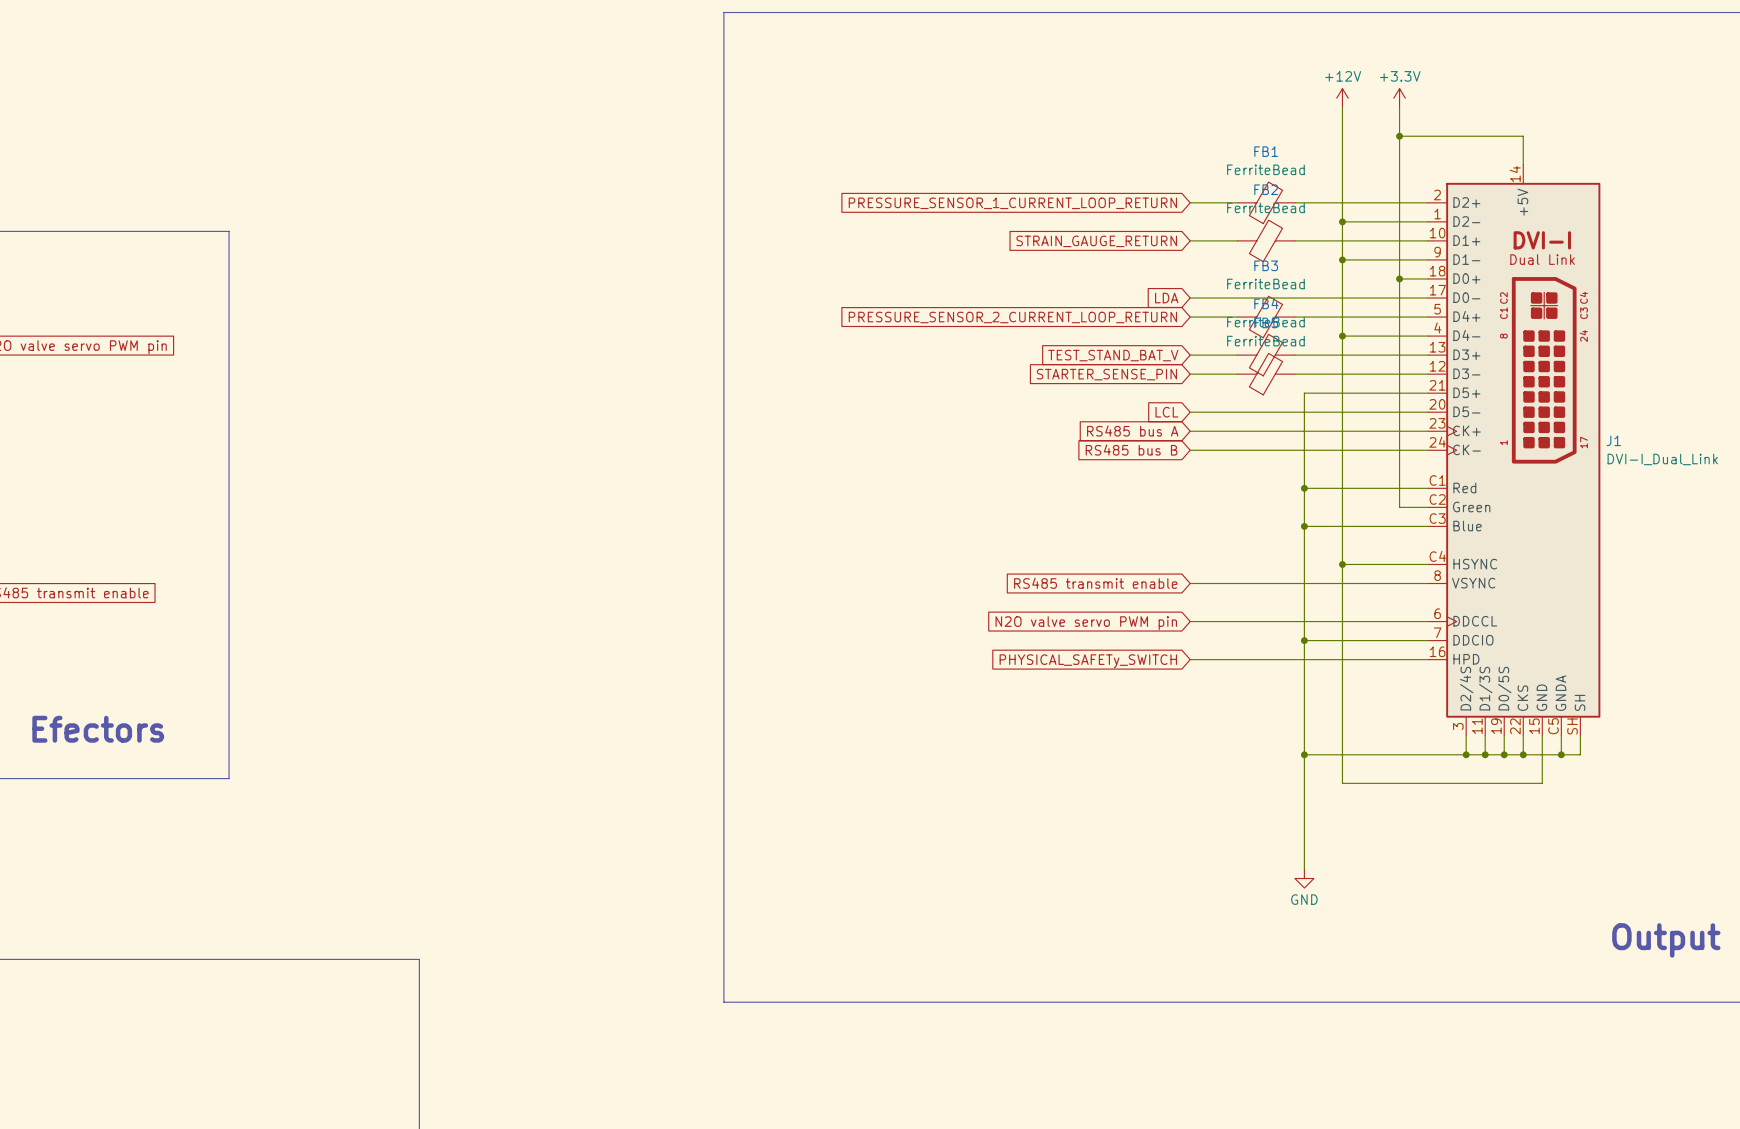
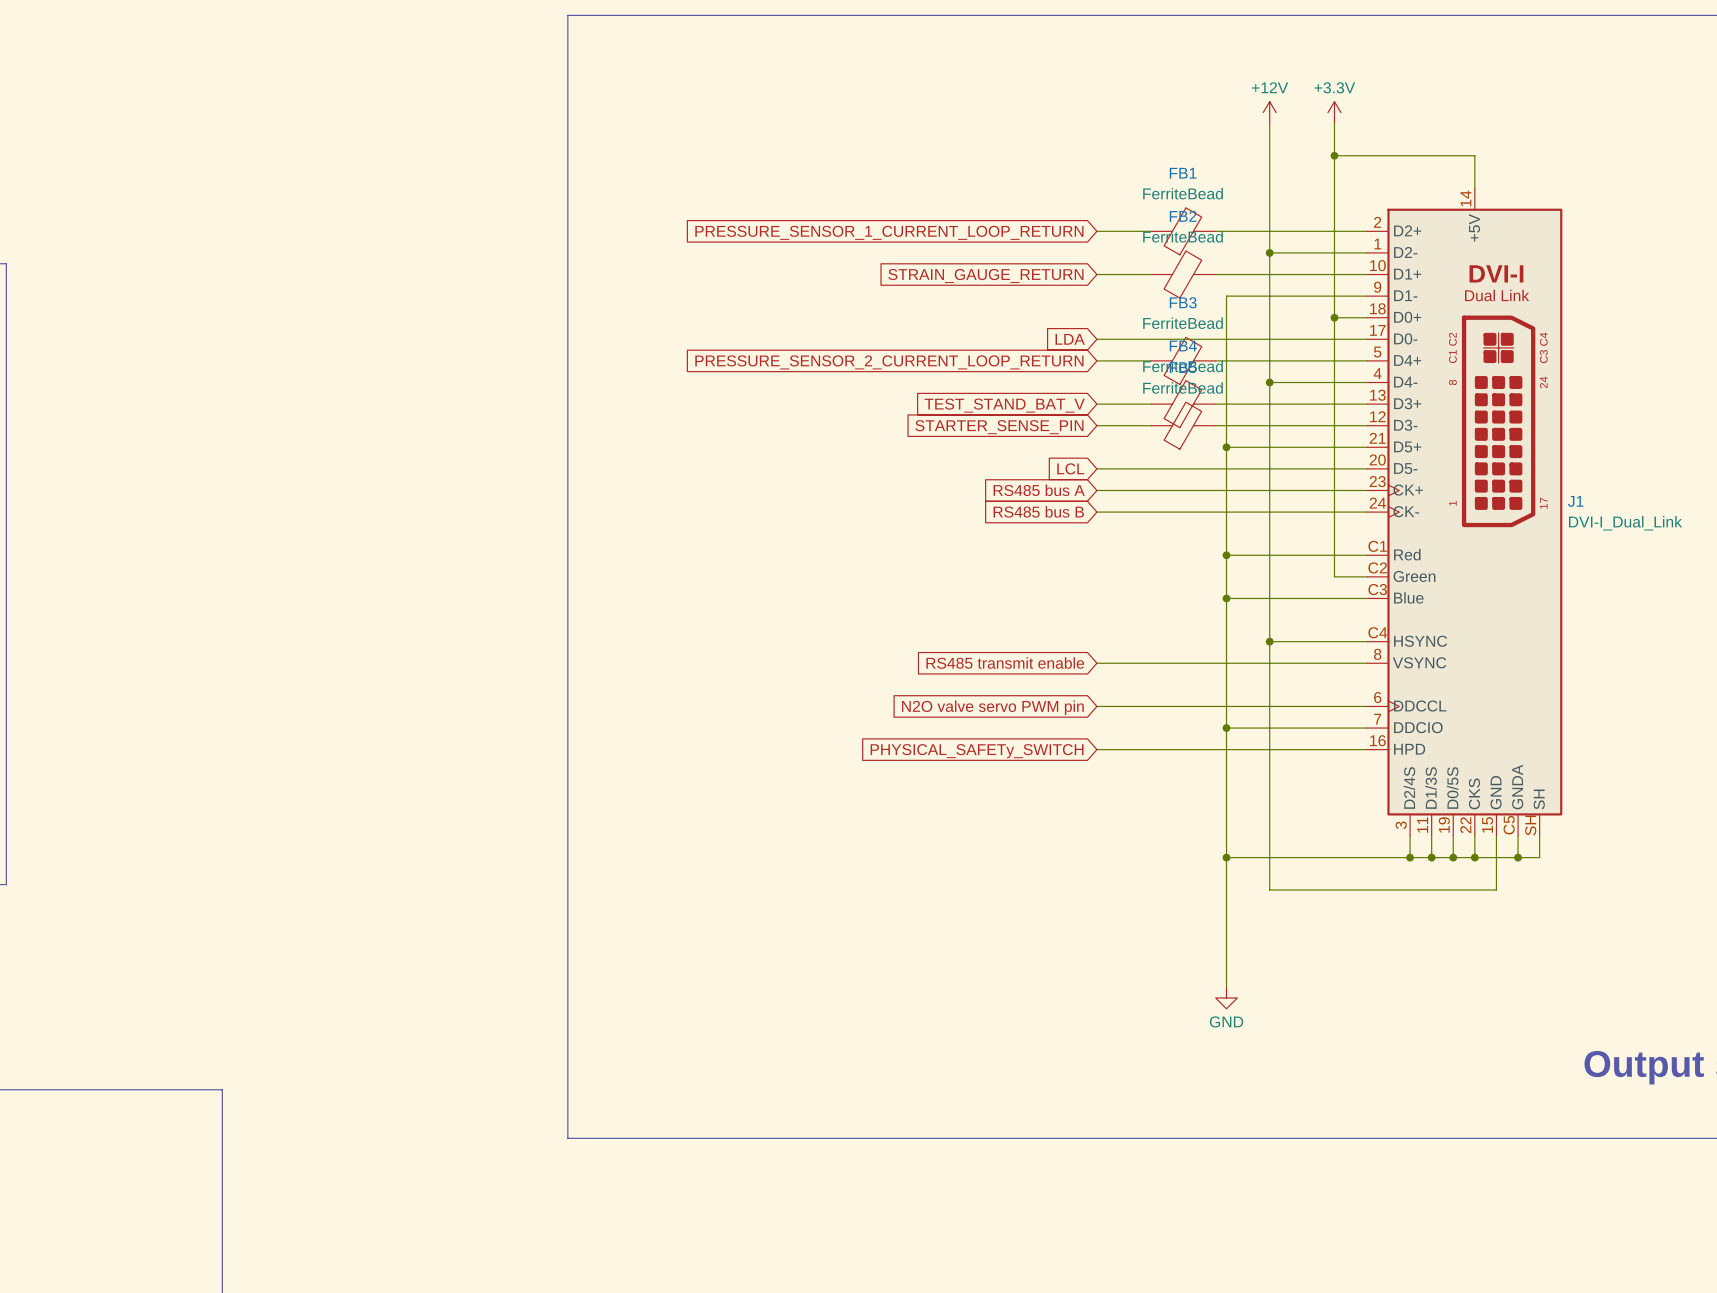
wire: none -> (1269, 296) (1226, 296) (1226, 447)
junction: (1342, 259) -> none
junction: none -> (1226, 447)

